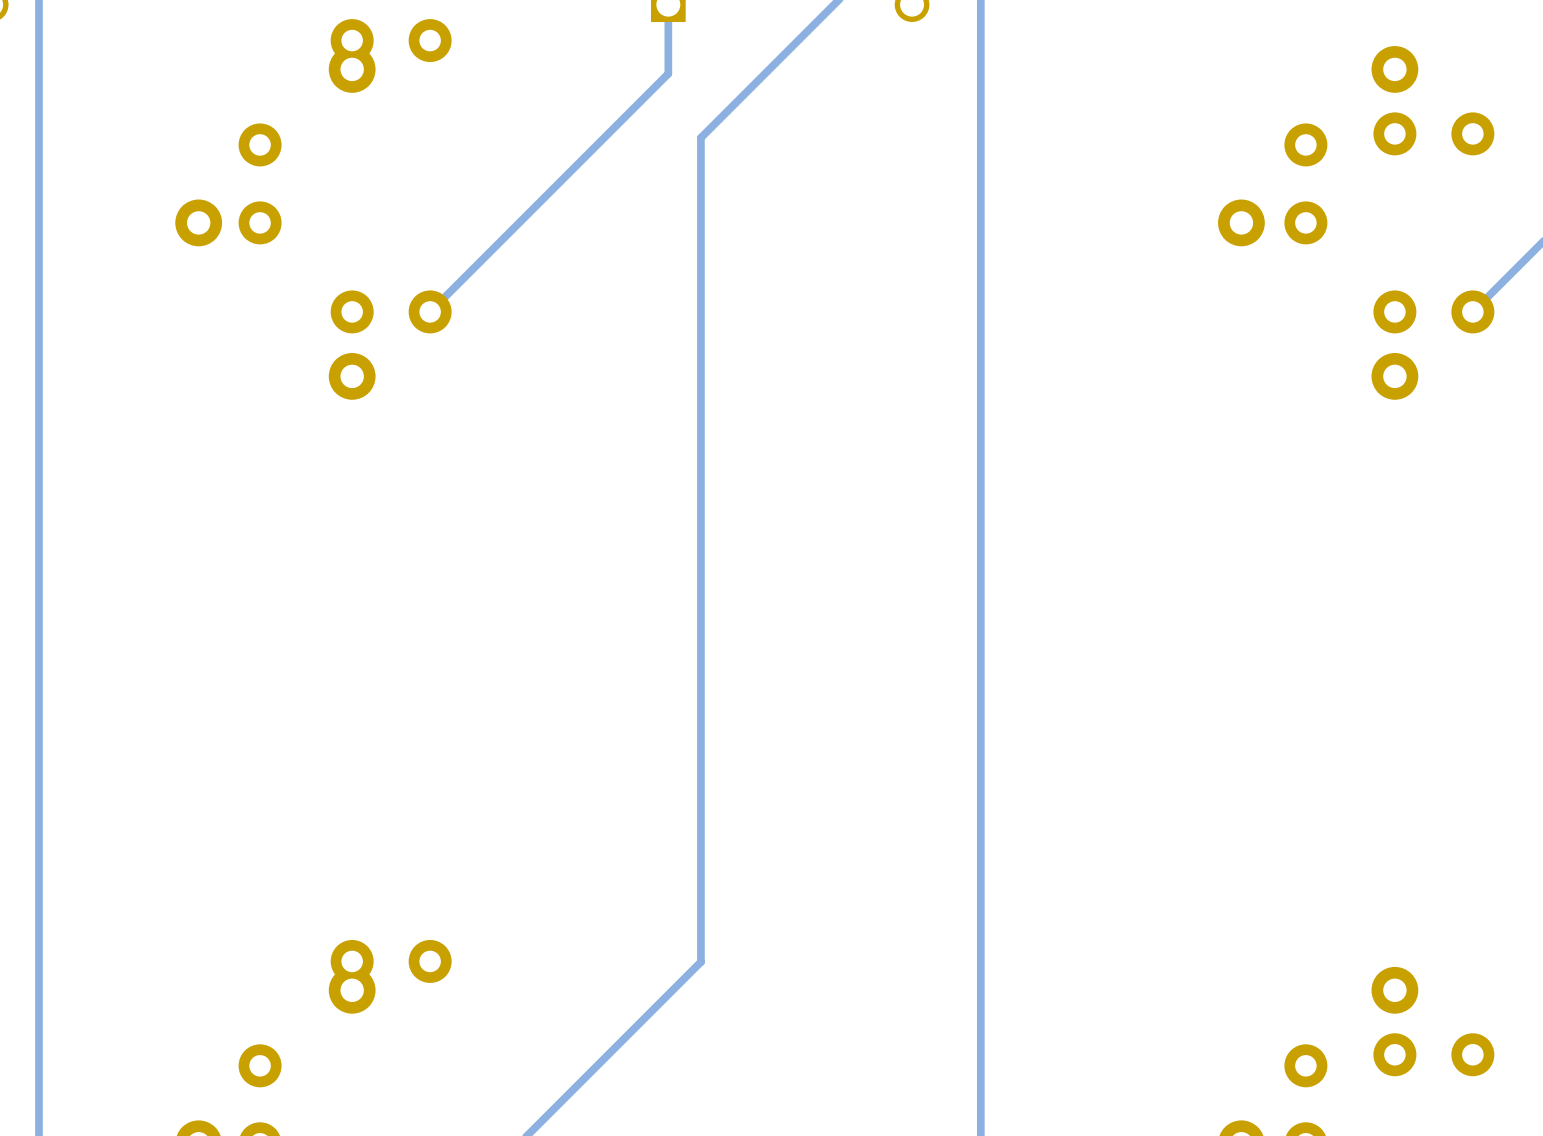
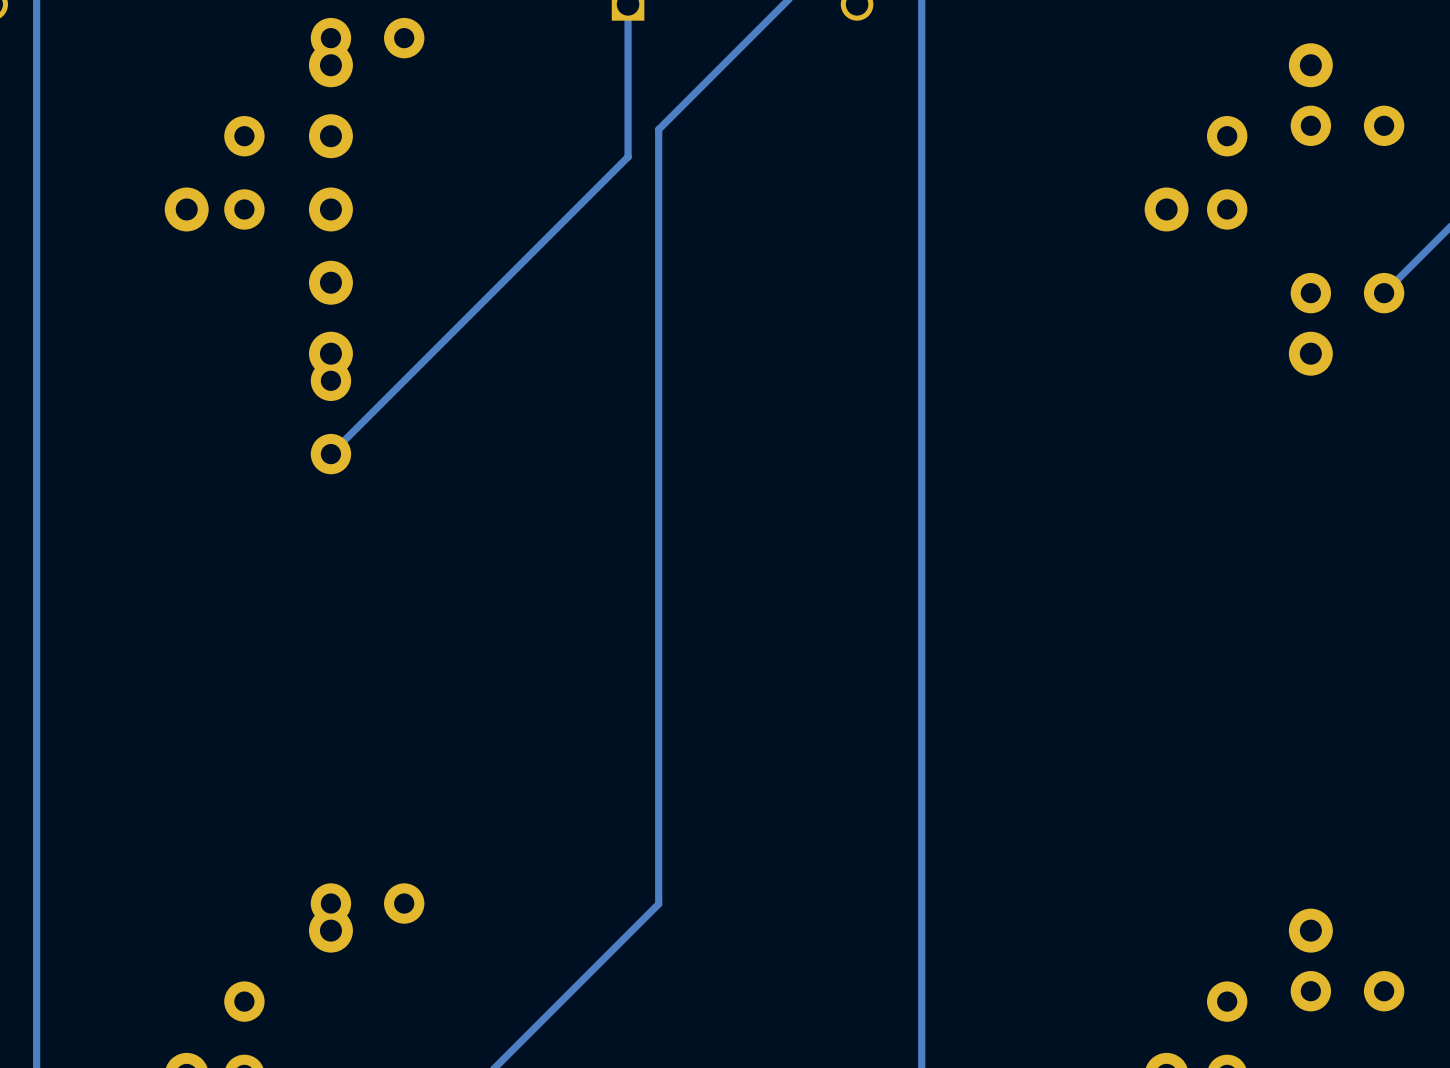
track: (668, 73) (430, 311) -> (628, 69) (628, 156) (330, 454)
part: none -> (330, 209)
part rotation: 0° (391, 311) -> 90° clockwise (330, 417)
part position: (391, 311) -> (330, 417)

